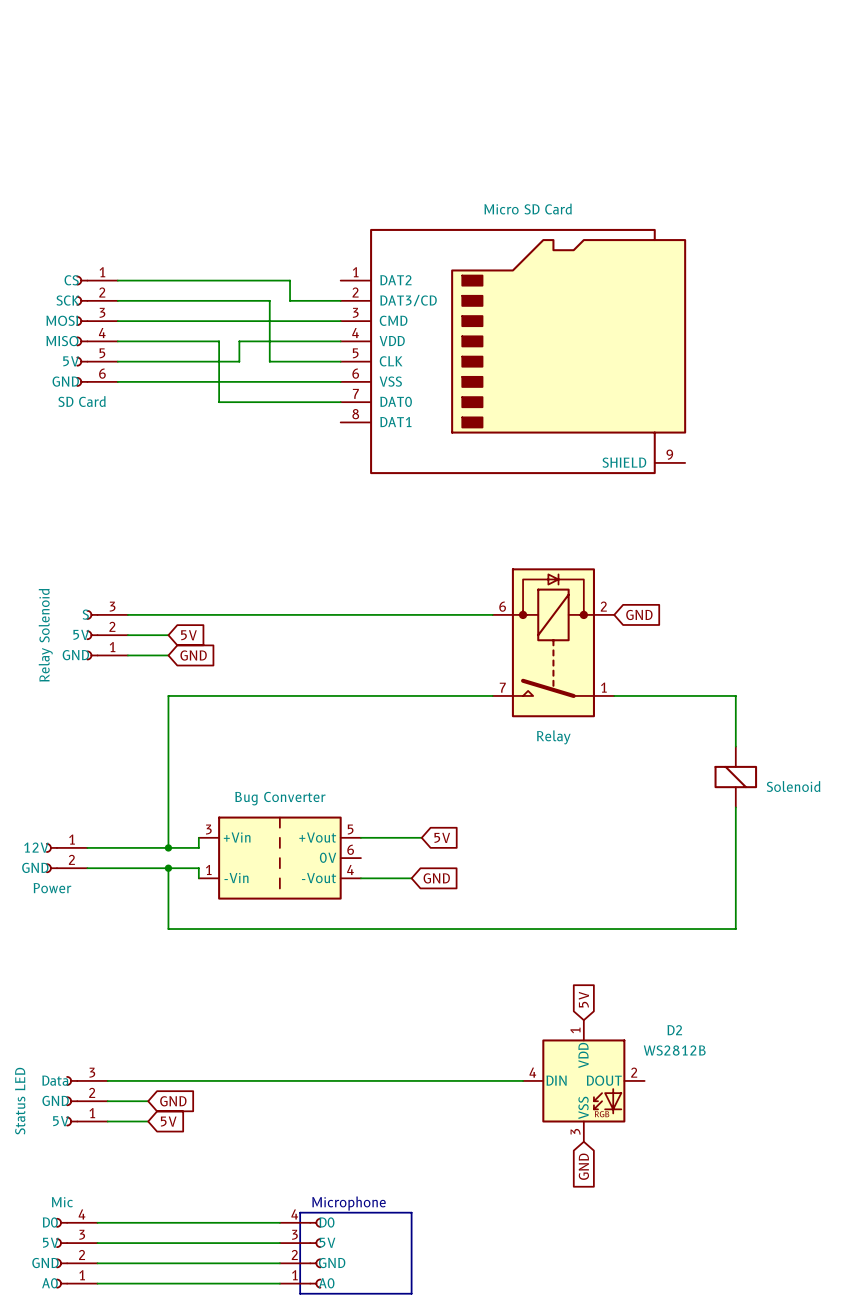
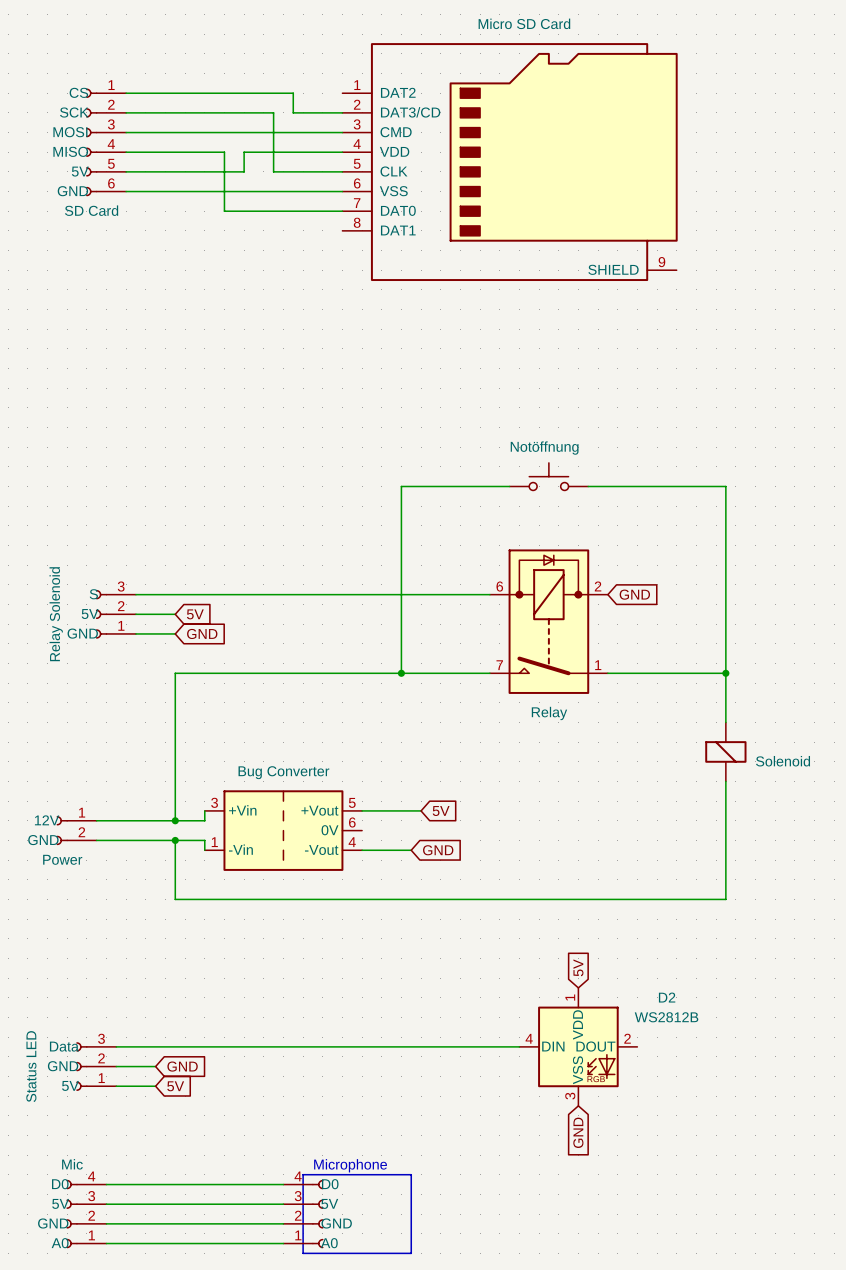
wire: (117, 280) (290, 280) (290, 300) (340, 300) -> (126, 93) (293, 93) (293, 112) (342, 112)
wire: (117, 300) (269, 300) (269, 361) (340, 361) -> (126, 112) (273, 112) (273, 171) (342, 171)
wire: (117, 321) (340, 321) -> (126, 132) (342, 132)
part position: (97, 331) -> (106, 142)
wire: (117, 341) (219, 341) (219, 402) (340, 402) -> (126, 152) (224, 152) (224, 211) (342, 211)
wire: (340, 341) (239, 341) (239, 361) (117, 361) -> (342, 152) (244, 152) (244, 171) (126, 171)
part position: (513, 351) -> (510, 162)
wire: (117, 381) (340, 381) -> (126, 191) (342, 191)
part: none -> Notöffnung (548, 476)
wire: none -> (509, 486) (401, 486) (401, 673)
wire: none -> (588, 486) (725, 486) (725, 673)
junction: none -> (401, 673)
junction: none -> (725, 673)

